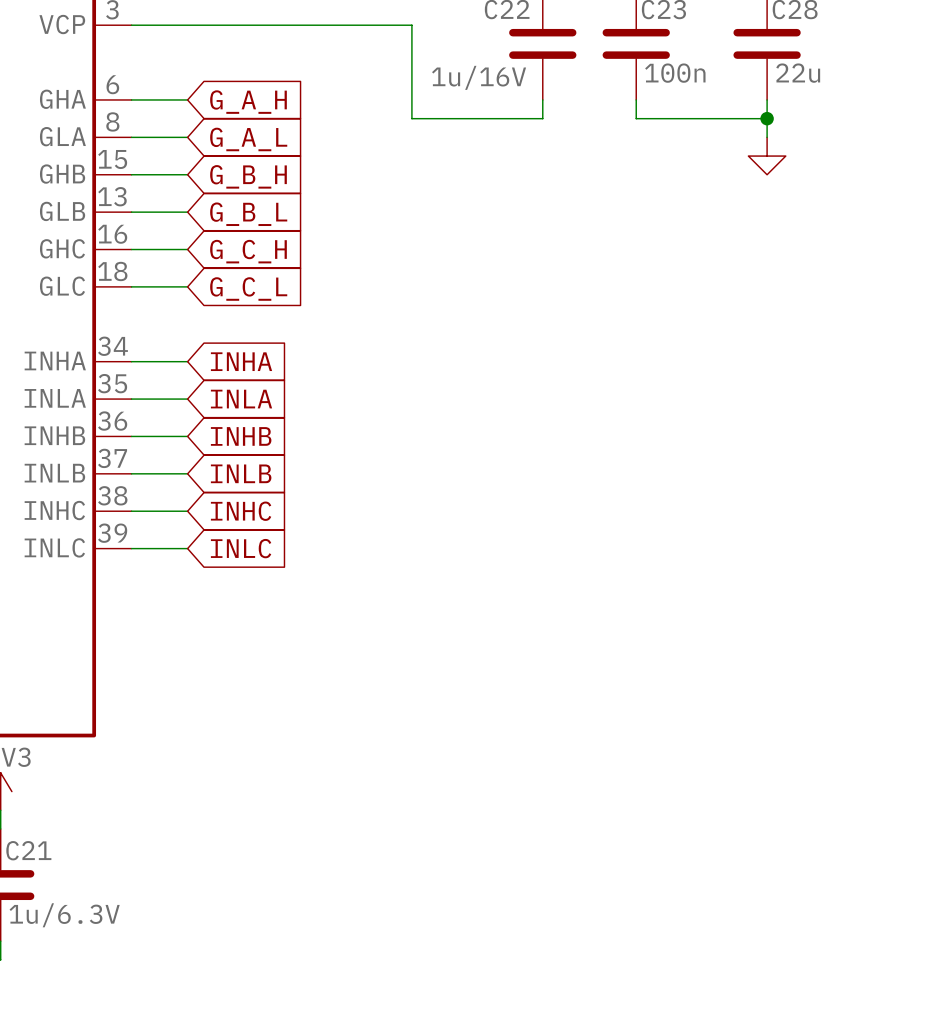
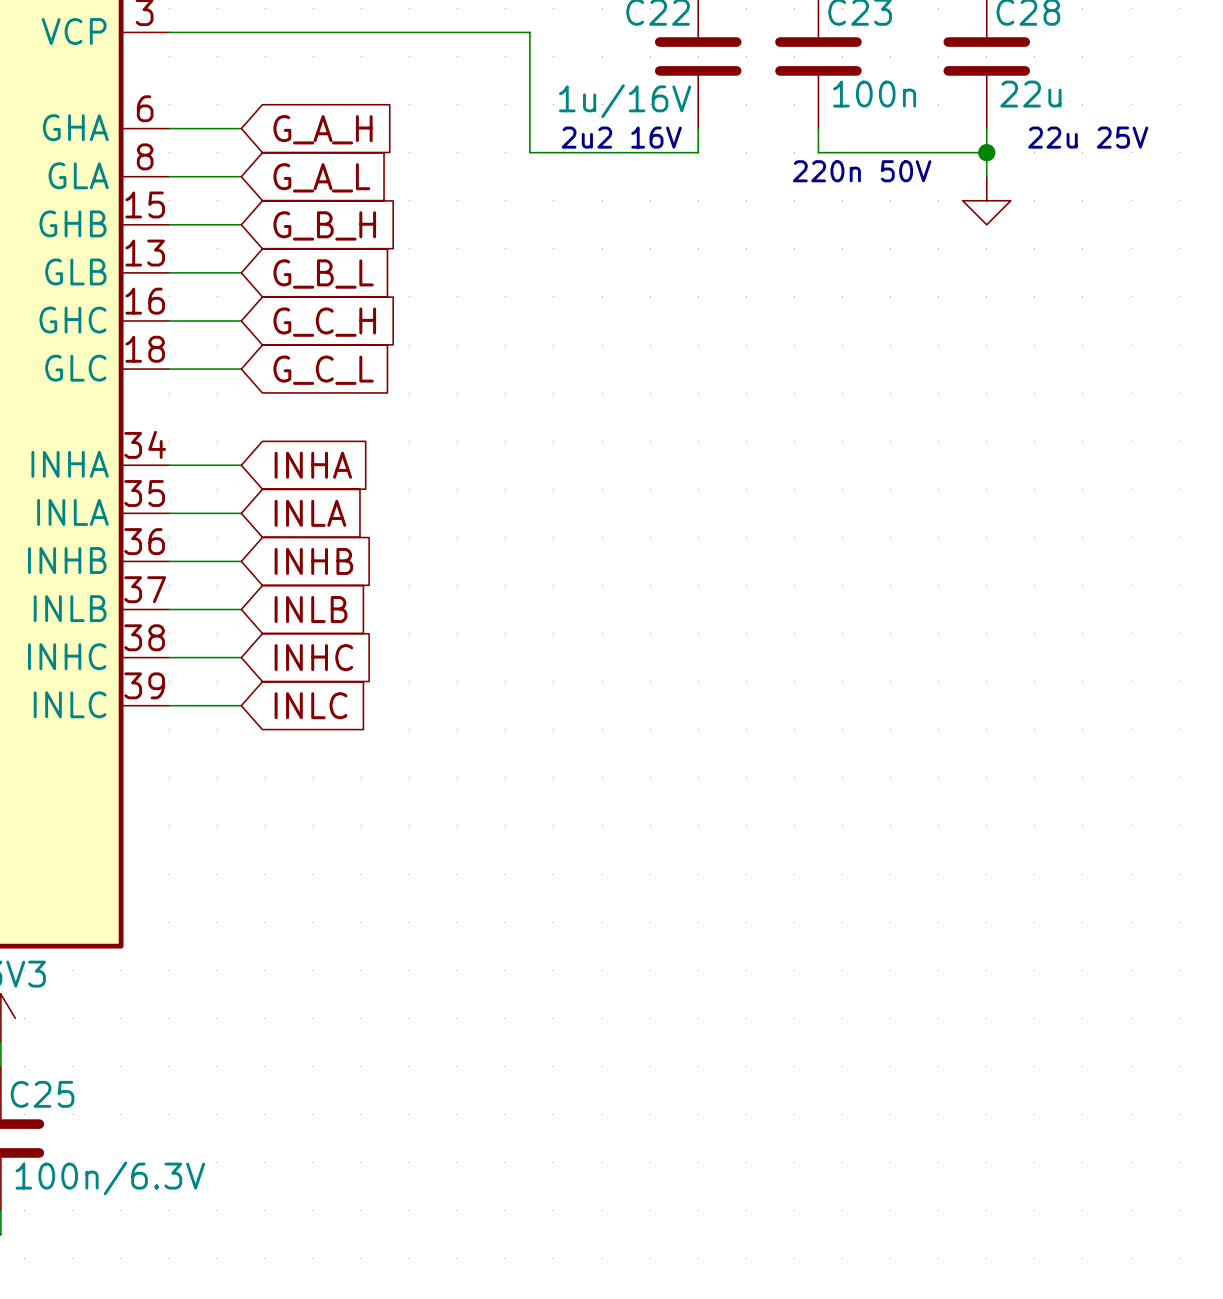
text: none -> 2u2 16V (621, 137)
text: none -> 22u 25V (1088, 137)
text: none -> 220n 50V (862, 171)
C21 name: C21 (28, 850) -> C25 (42, 1094)
C21 value: 1u/6.3V (64, 915) -> 100n/6.3V (110, 1178)

